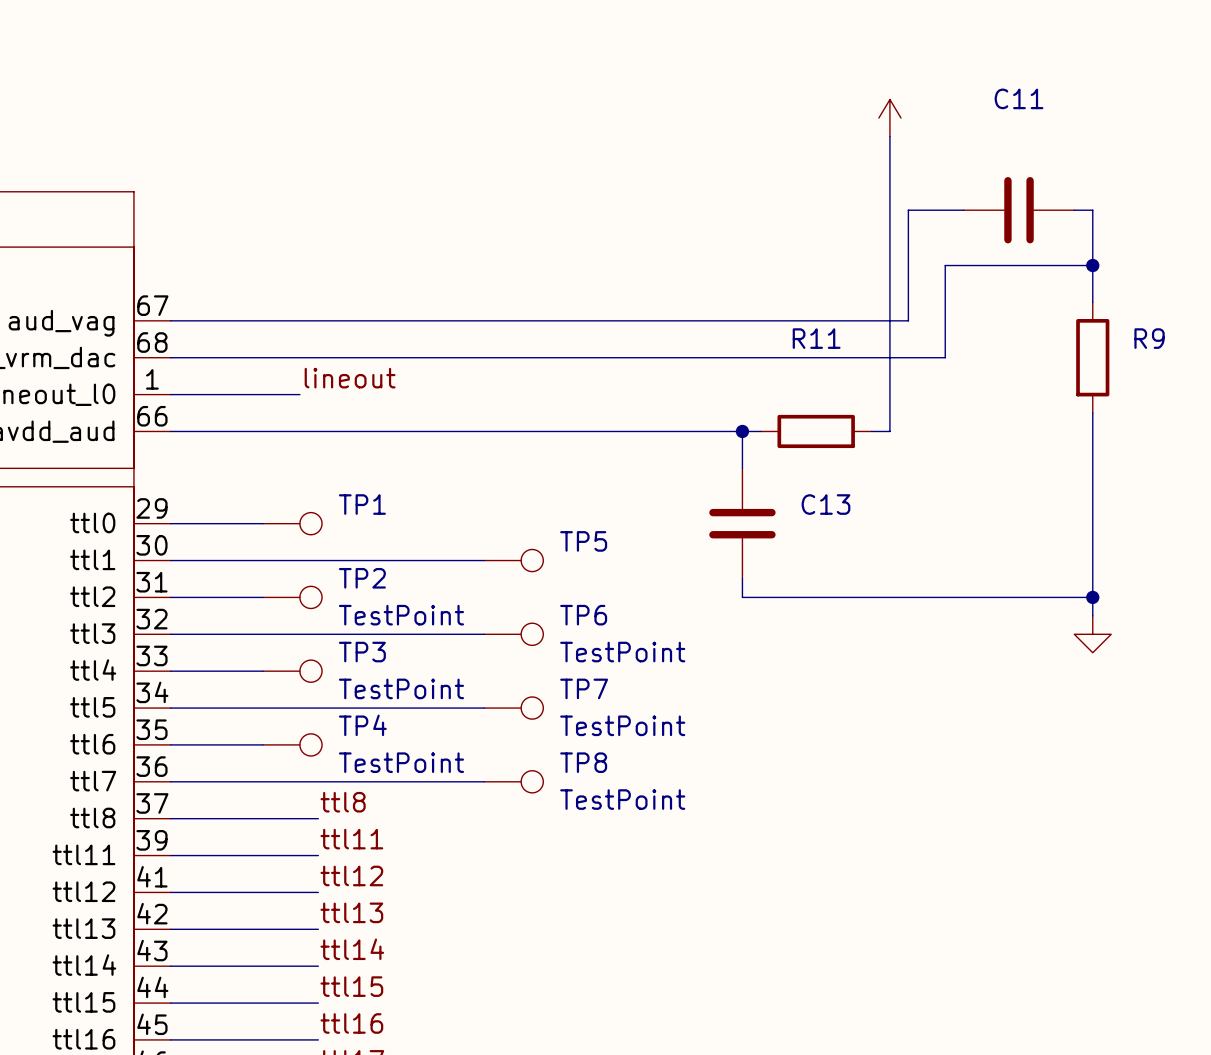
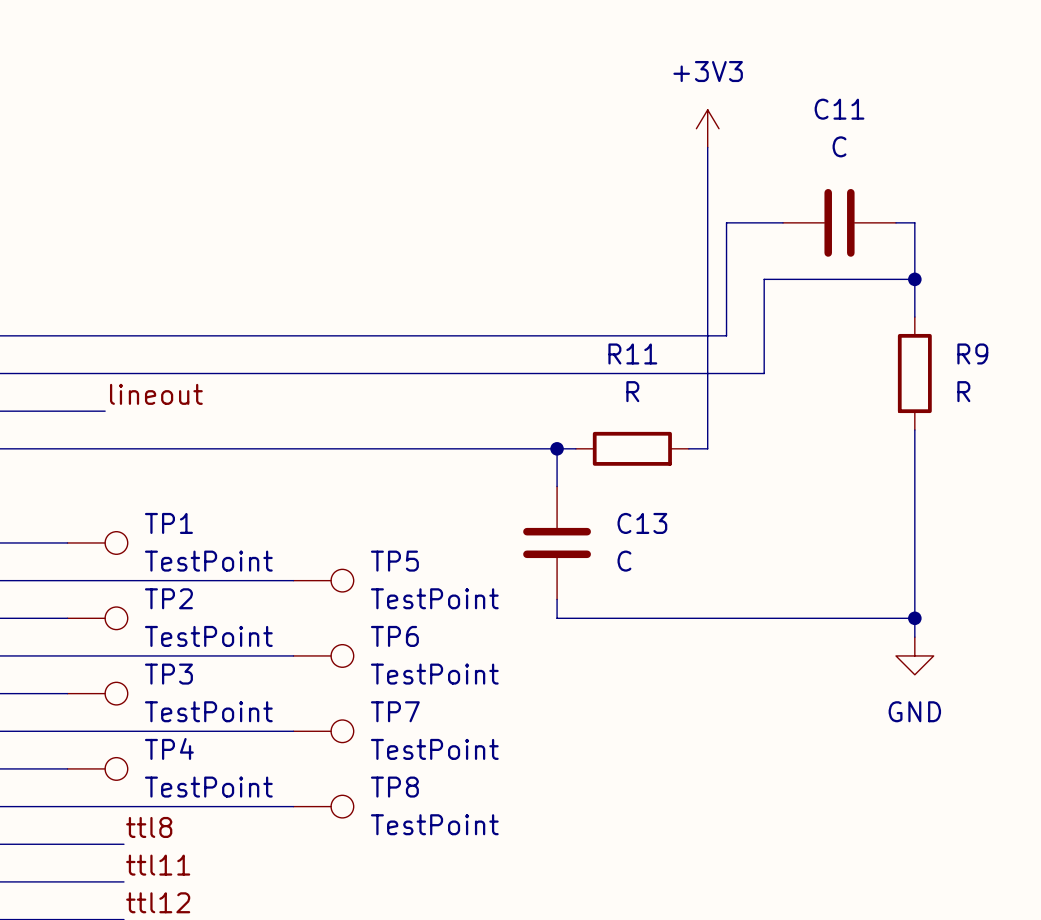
power symbol text: none -> +3V3 (708, 71)
C11 value: none -> C (839, 146)
R11 value: none -> R (632, 391)
R9 value: none -> R (963, 391)
TP1 value: none -> TestPoint (208, 561)
C13 value: none -> C (624, 561)
TP5 value: none -> TestPoint (434, 598)
power symbol text: none -> GND (914, 711)

